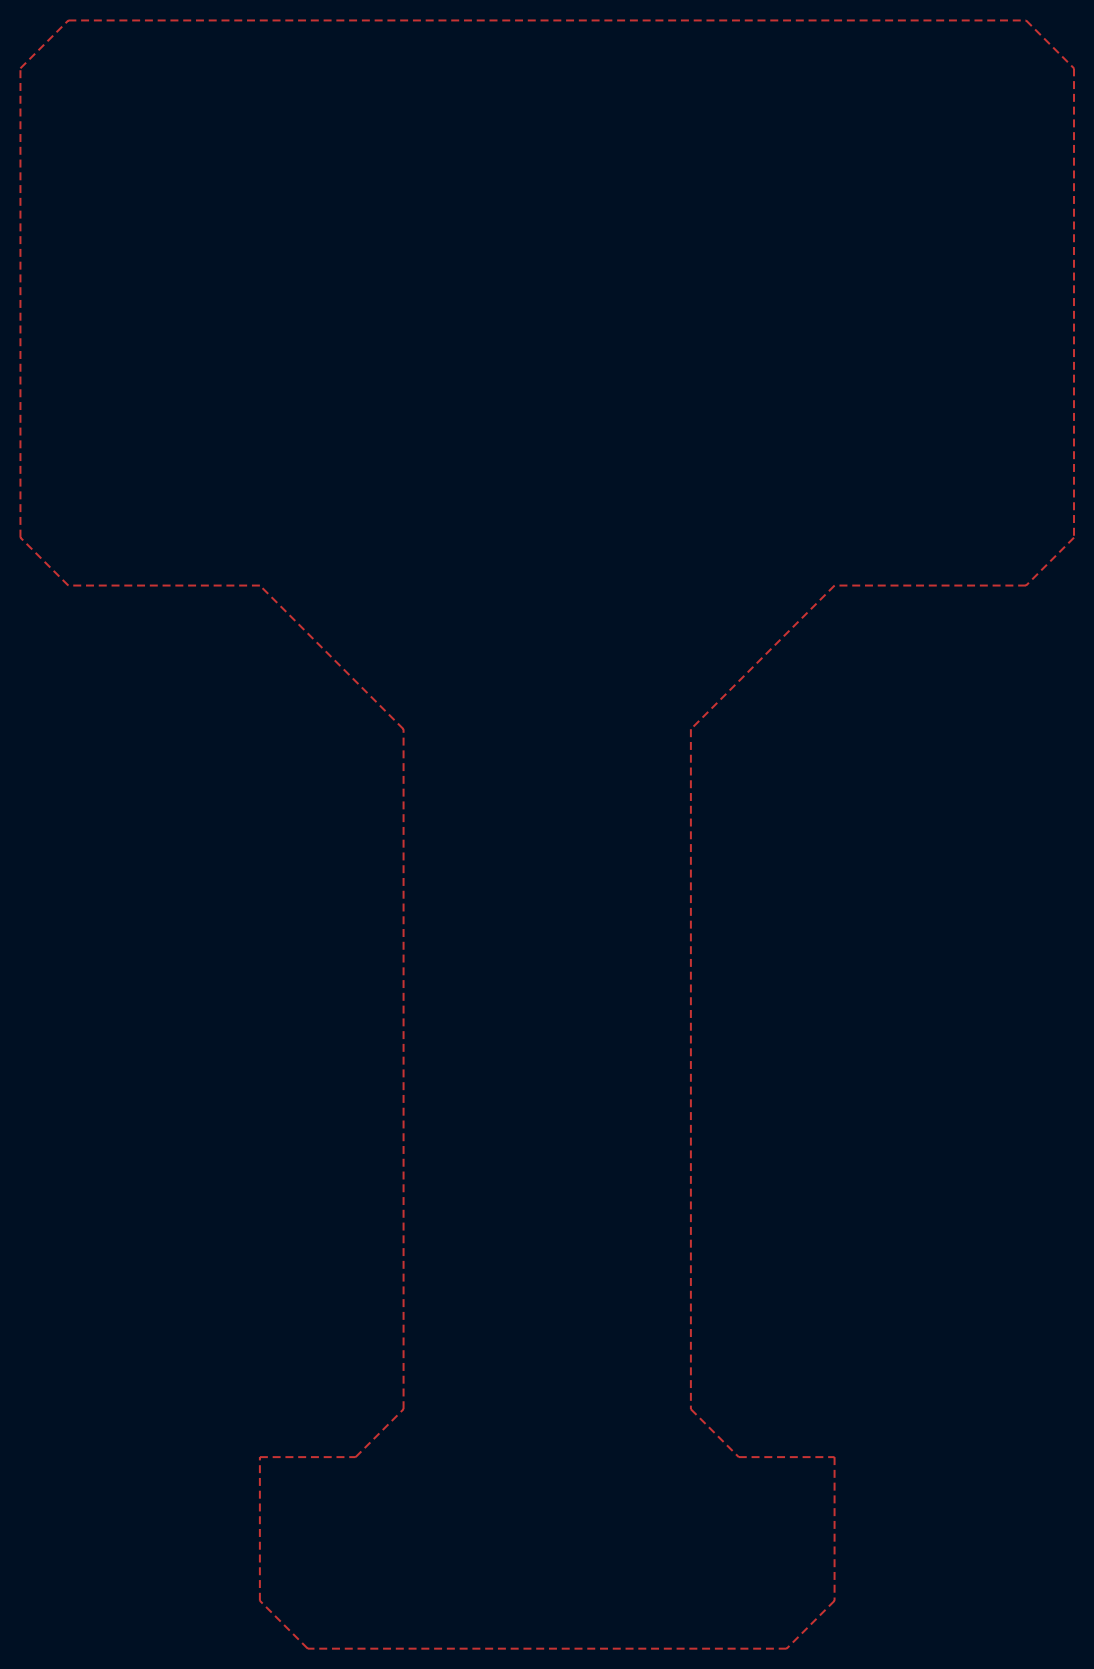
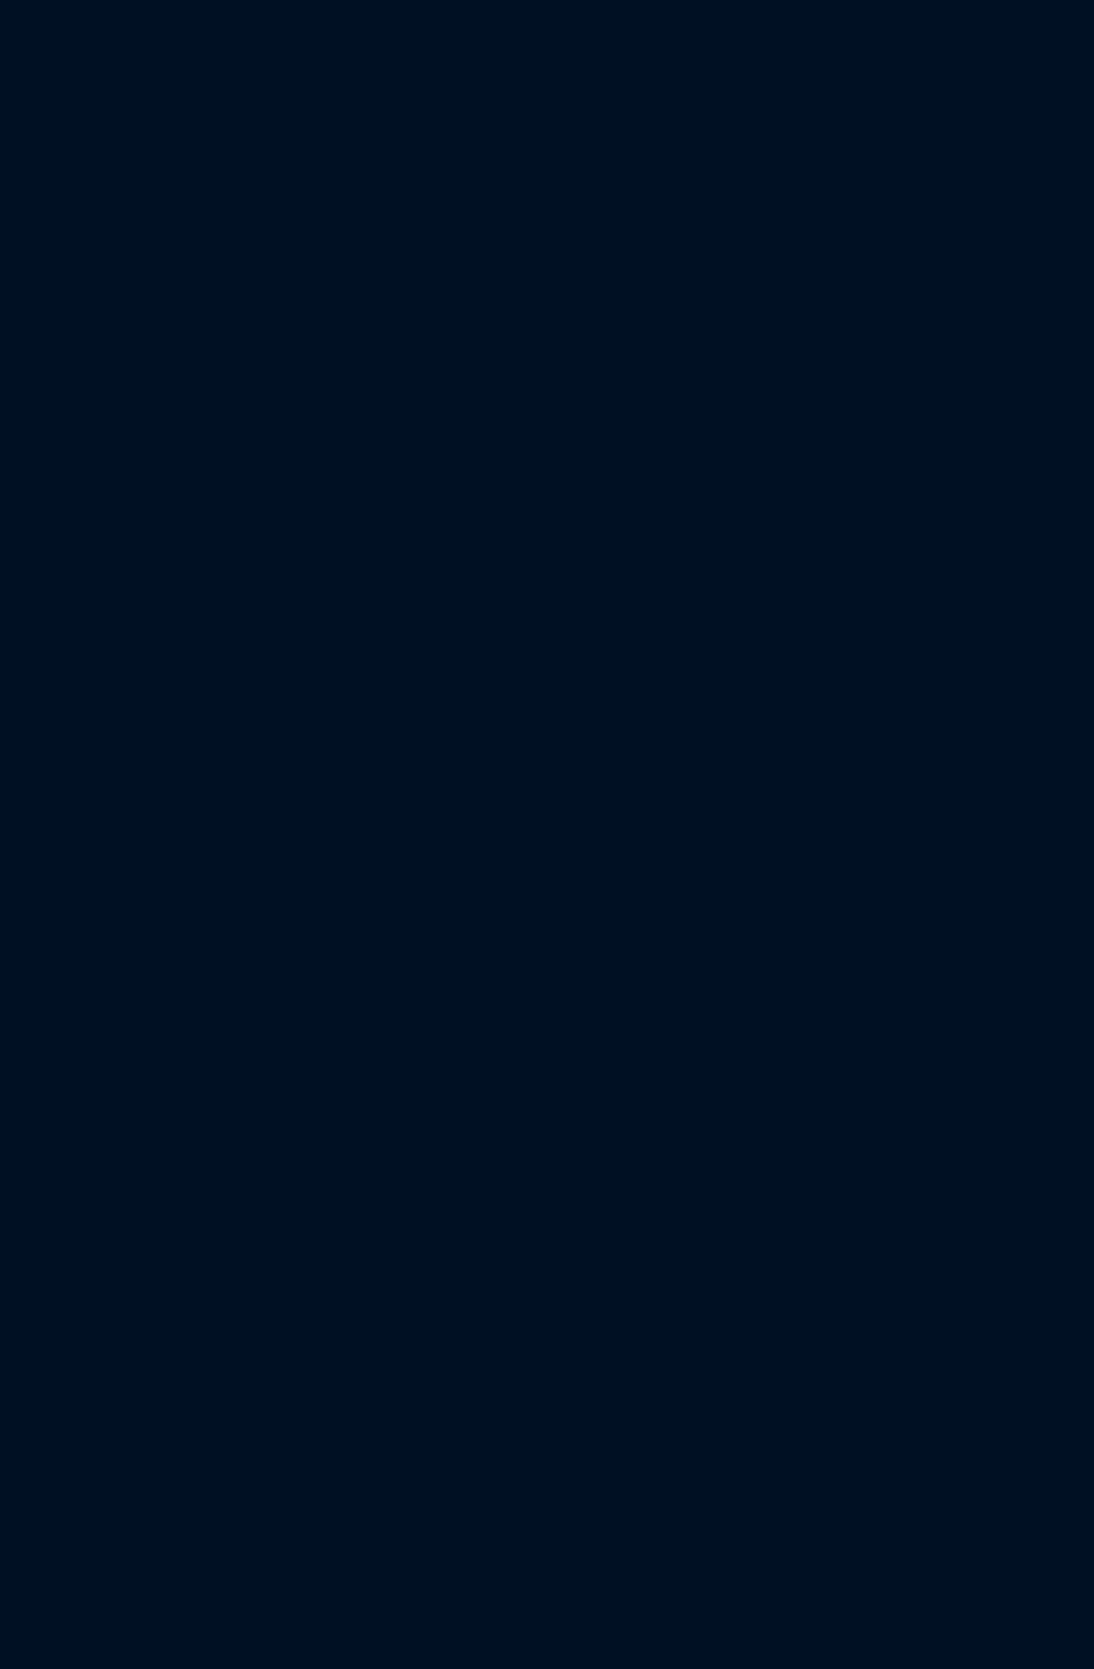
zone outline: (68, 20) (20, 68) (20, 537) (68, 585) (259, 585) (403, 729) (403, 1409) (355, 1457) (259, 1457) (259, 1600) (307, 1648) (786, 1648) (834, 1600) (834, 1457) (738, 1457) (690, 1409) (690, 729) (834, 585) (1026, 585) (1074, 537) (1074, 68) (1026, 20) (68, 20) -> none

